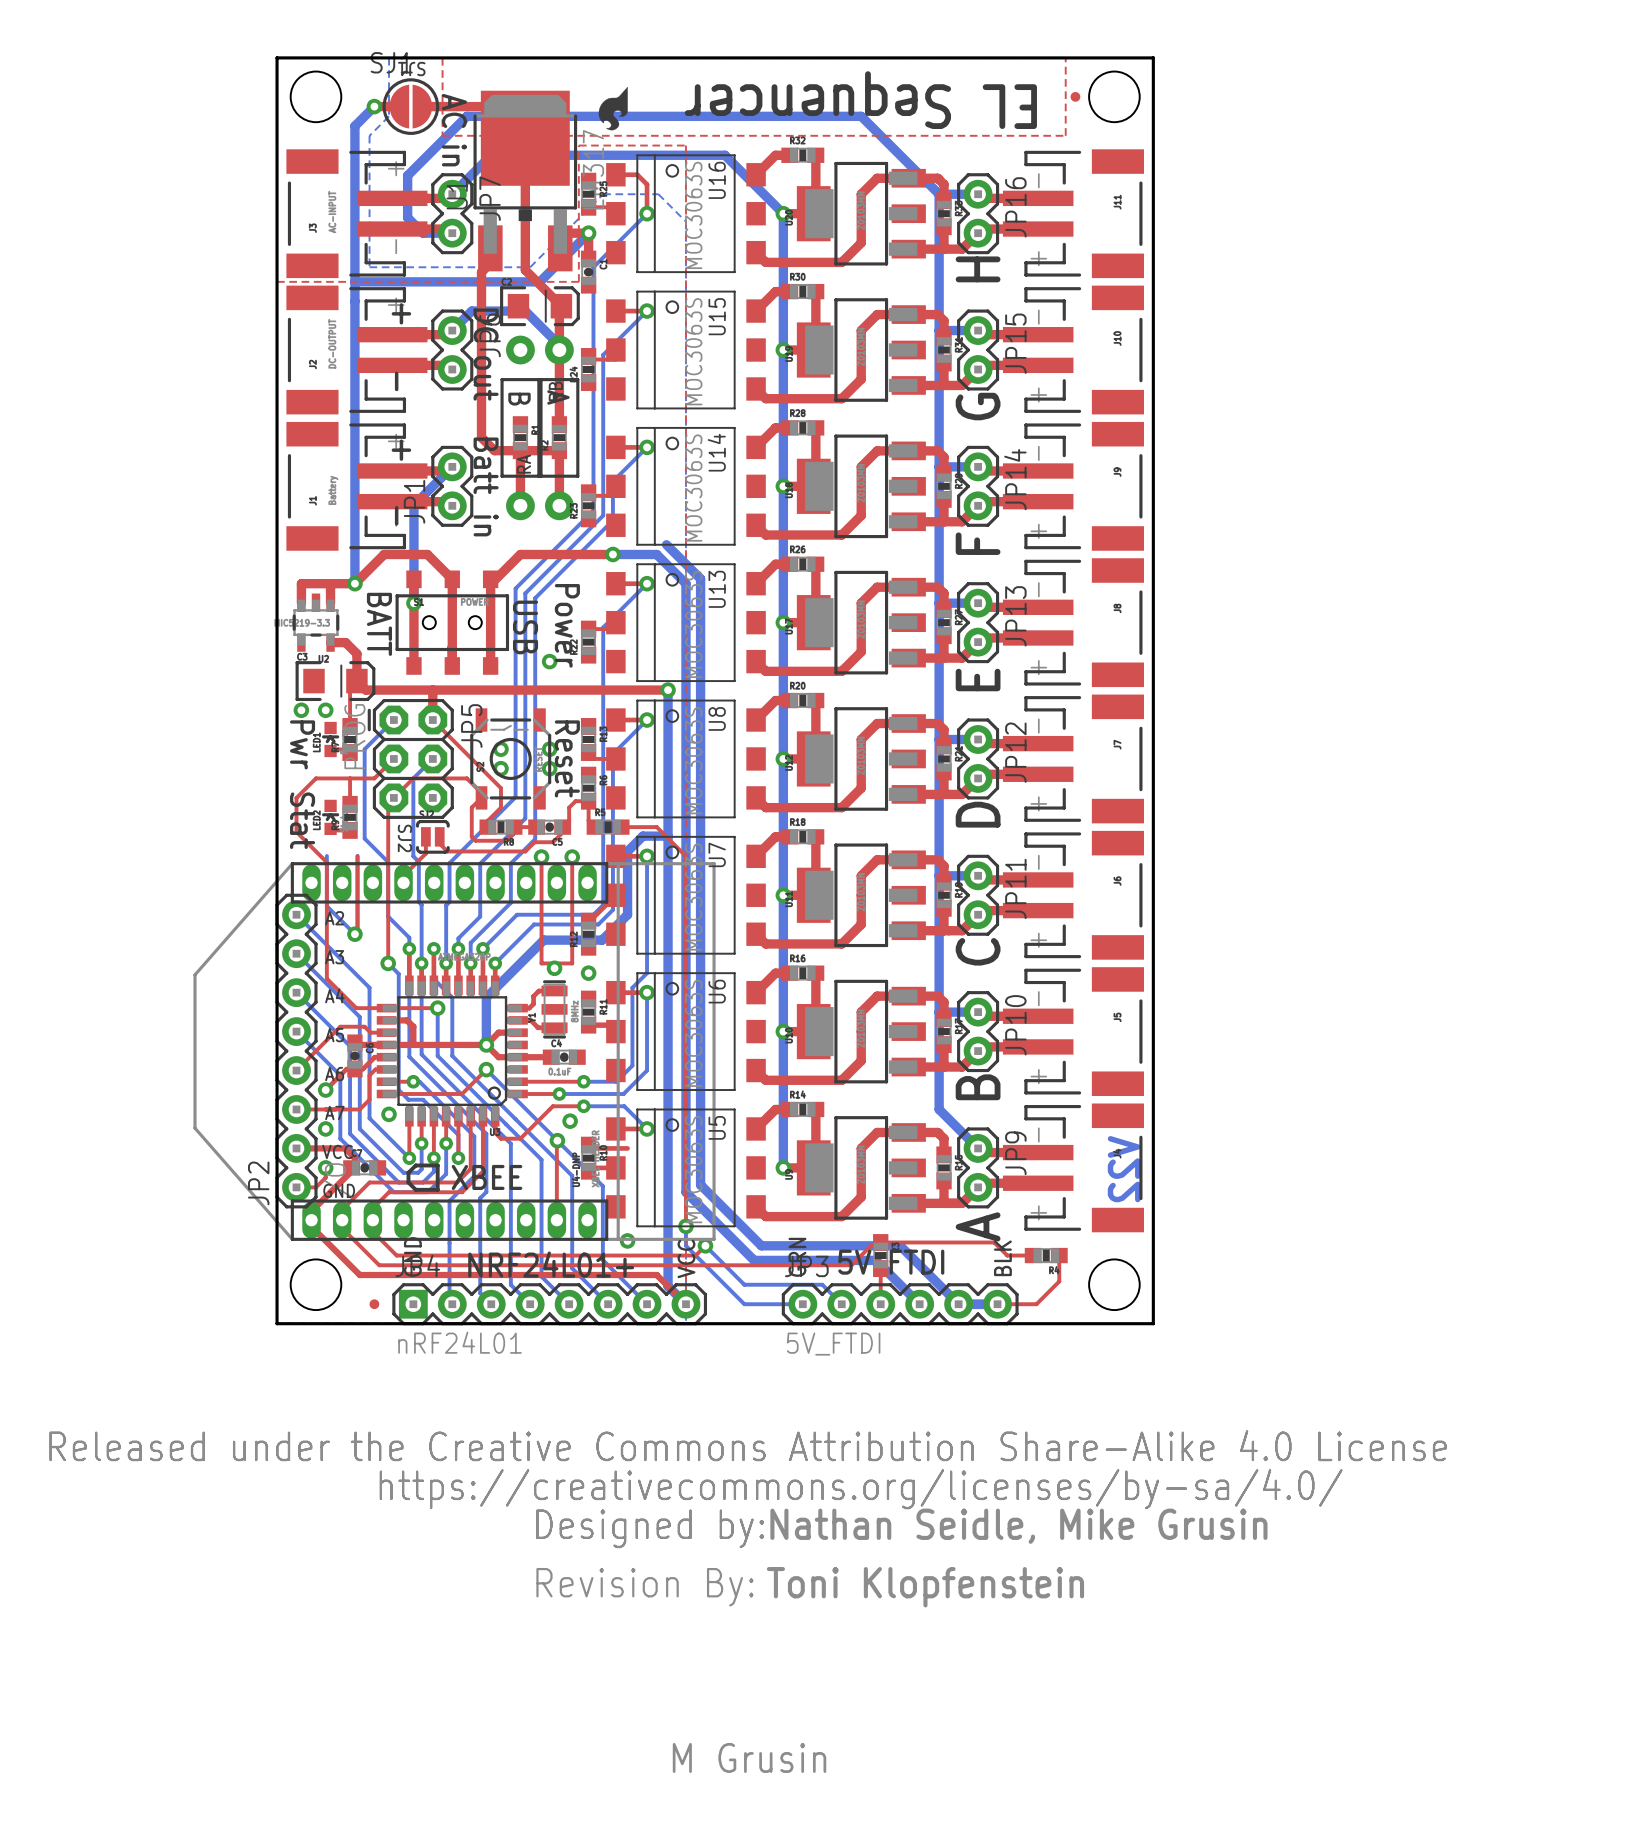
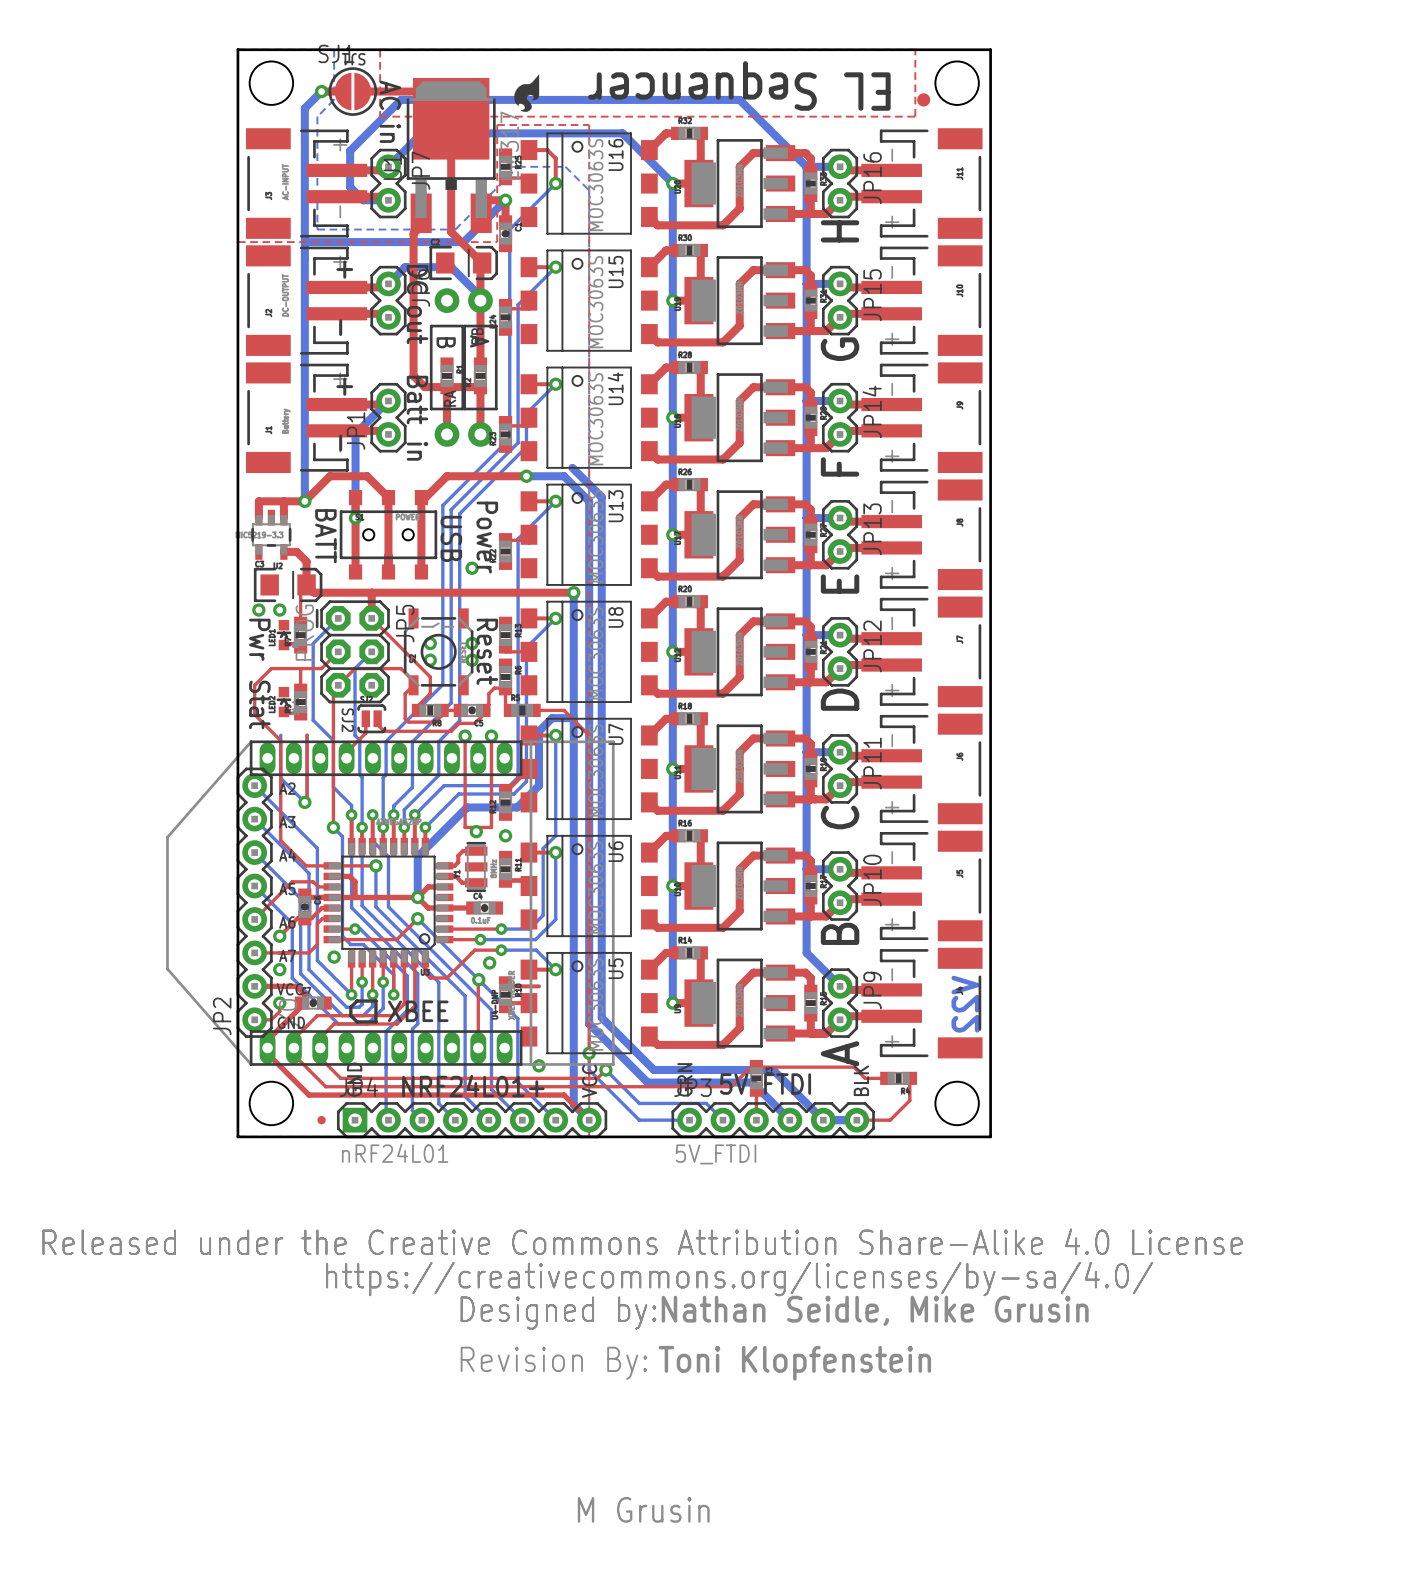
part: (1075, 96) -> none
part: none -> (923, 99)

